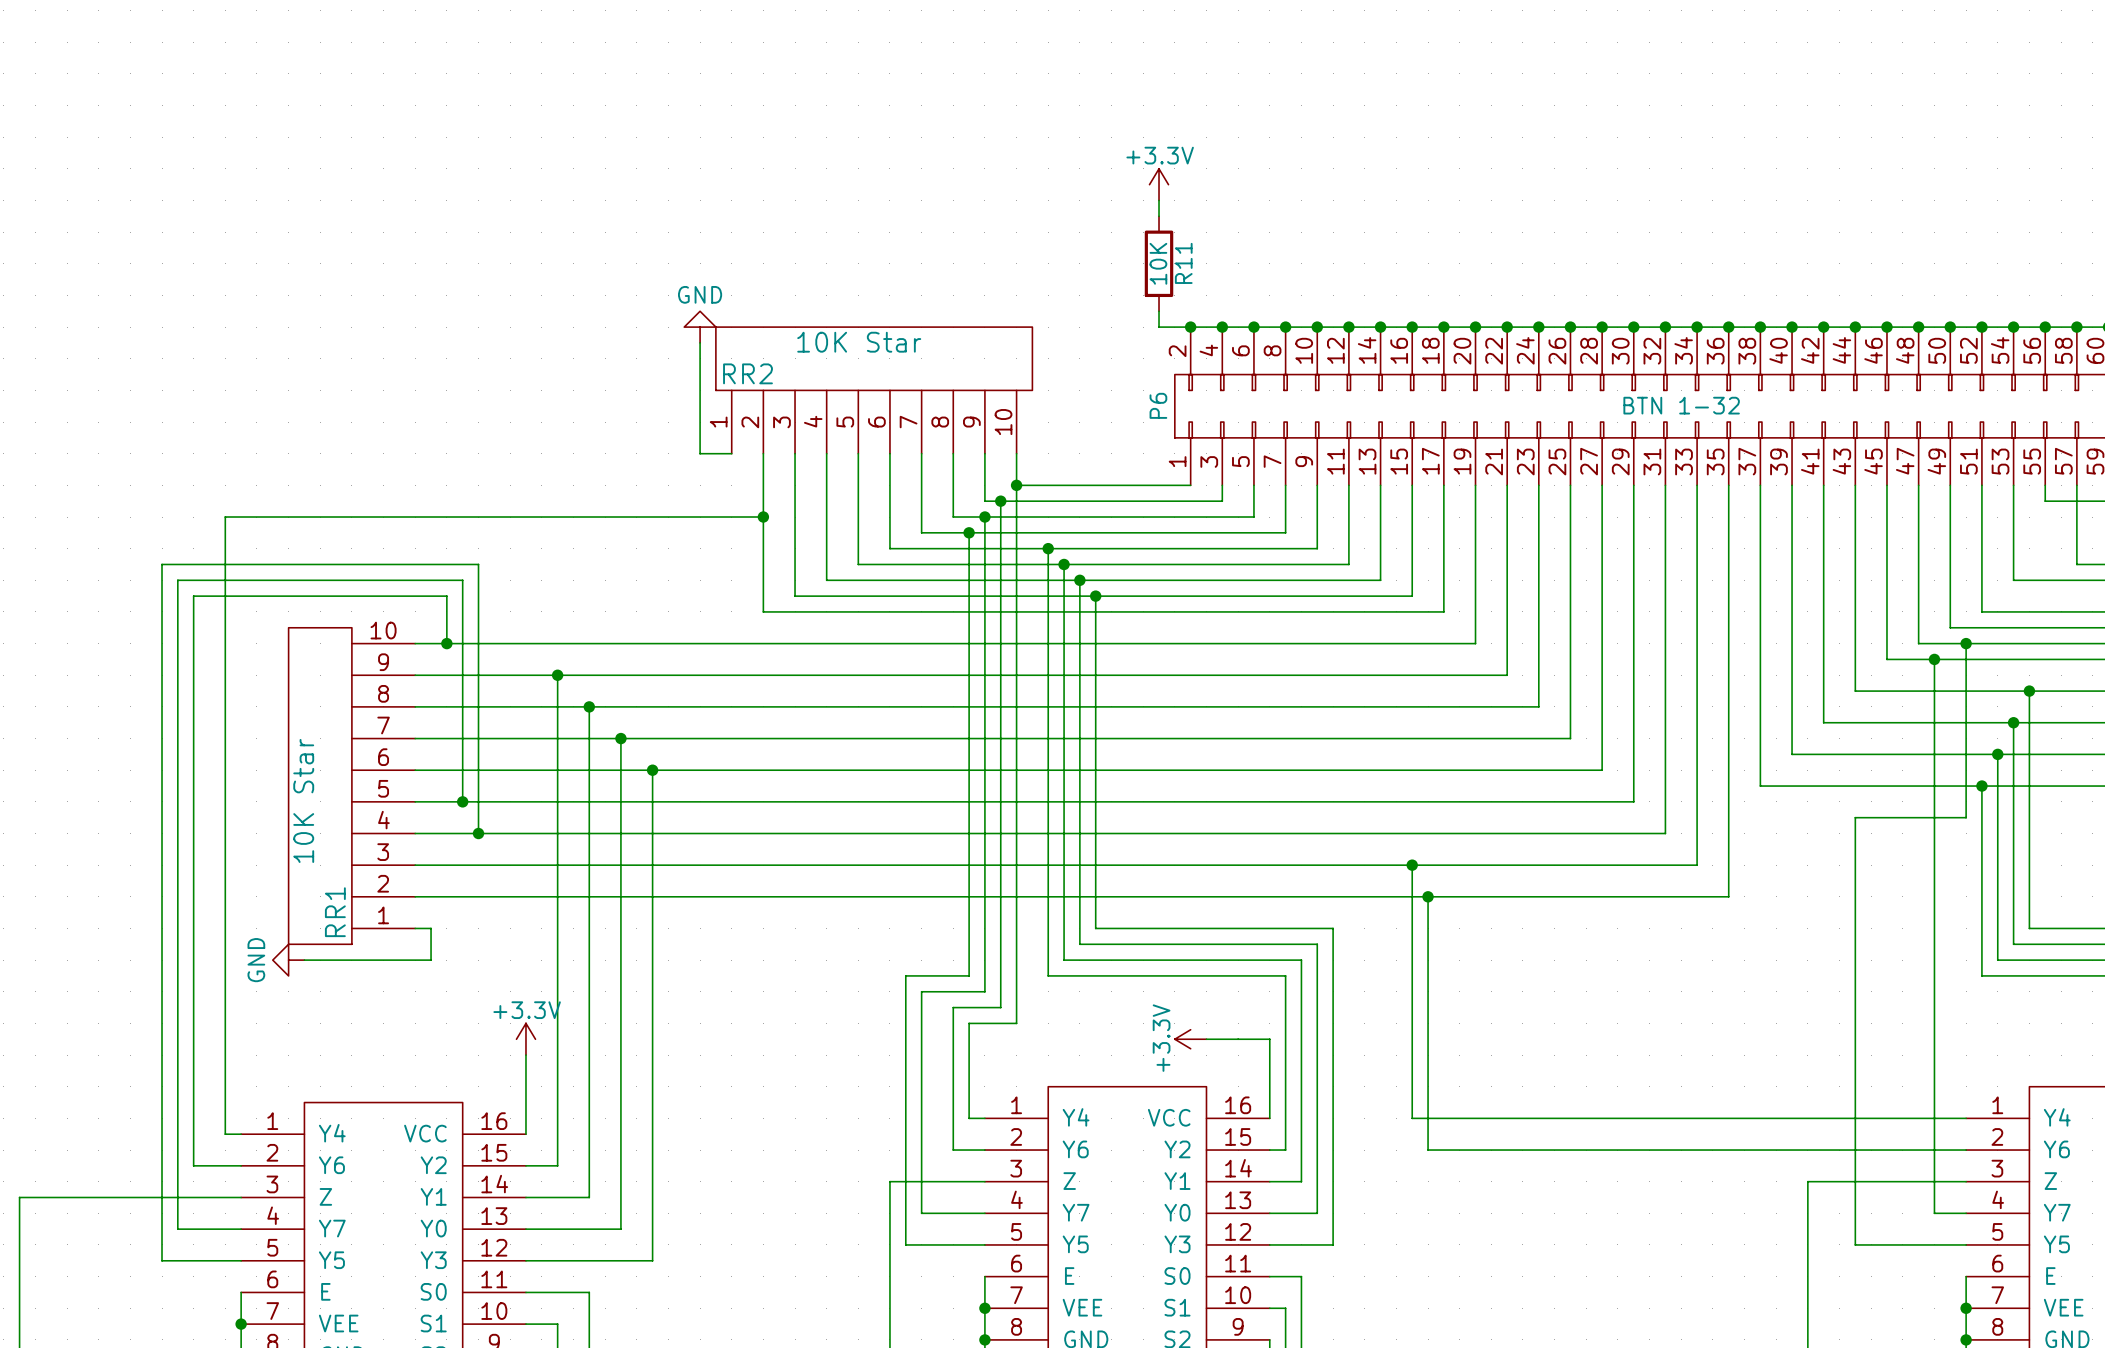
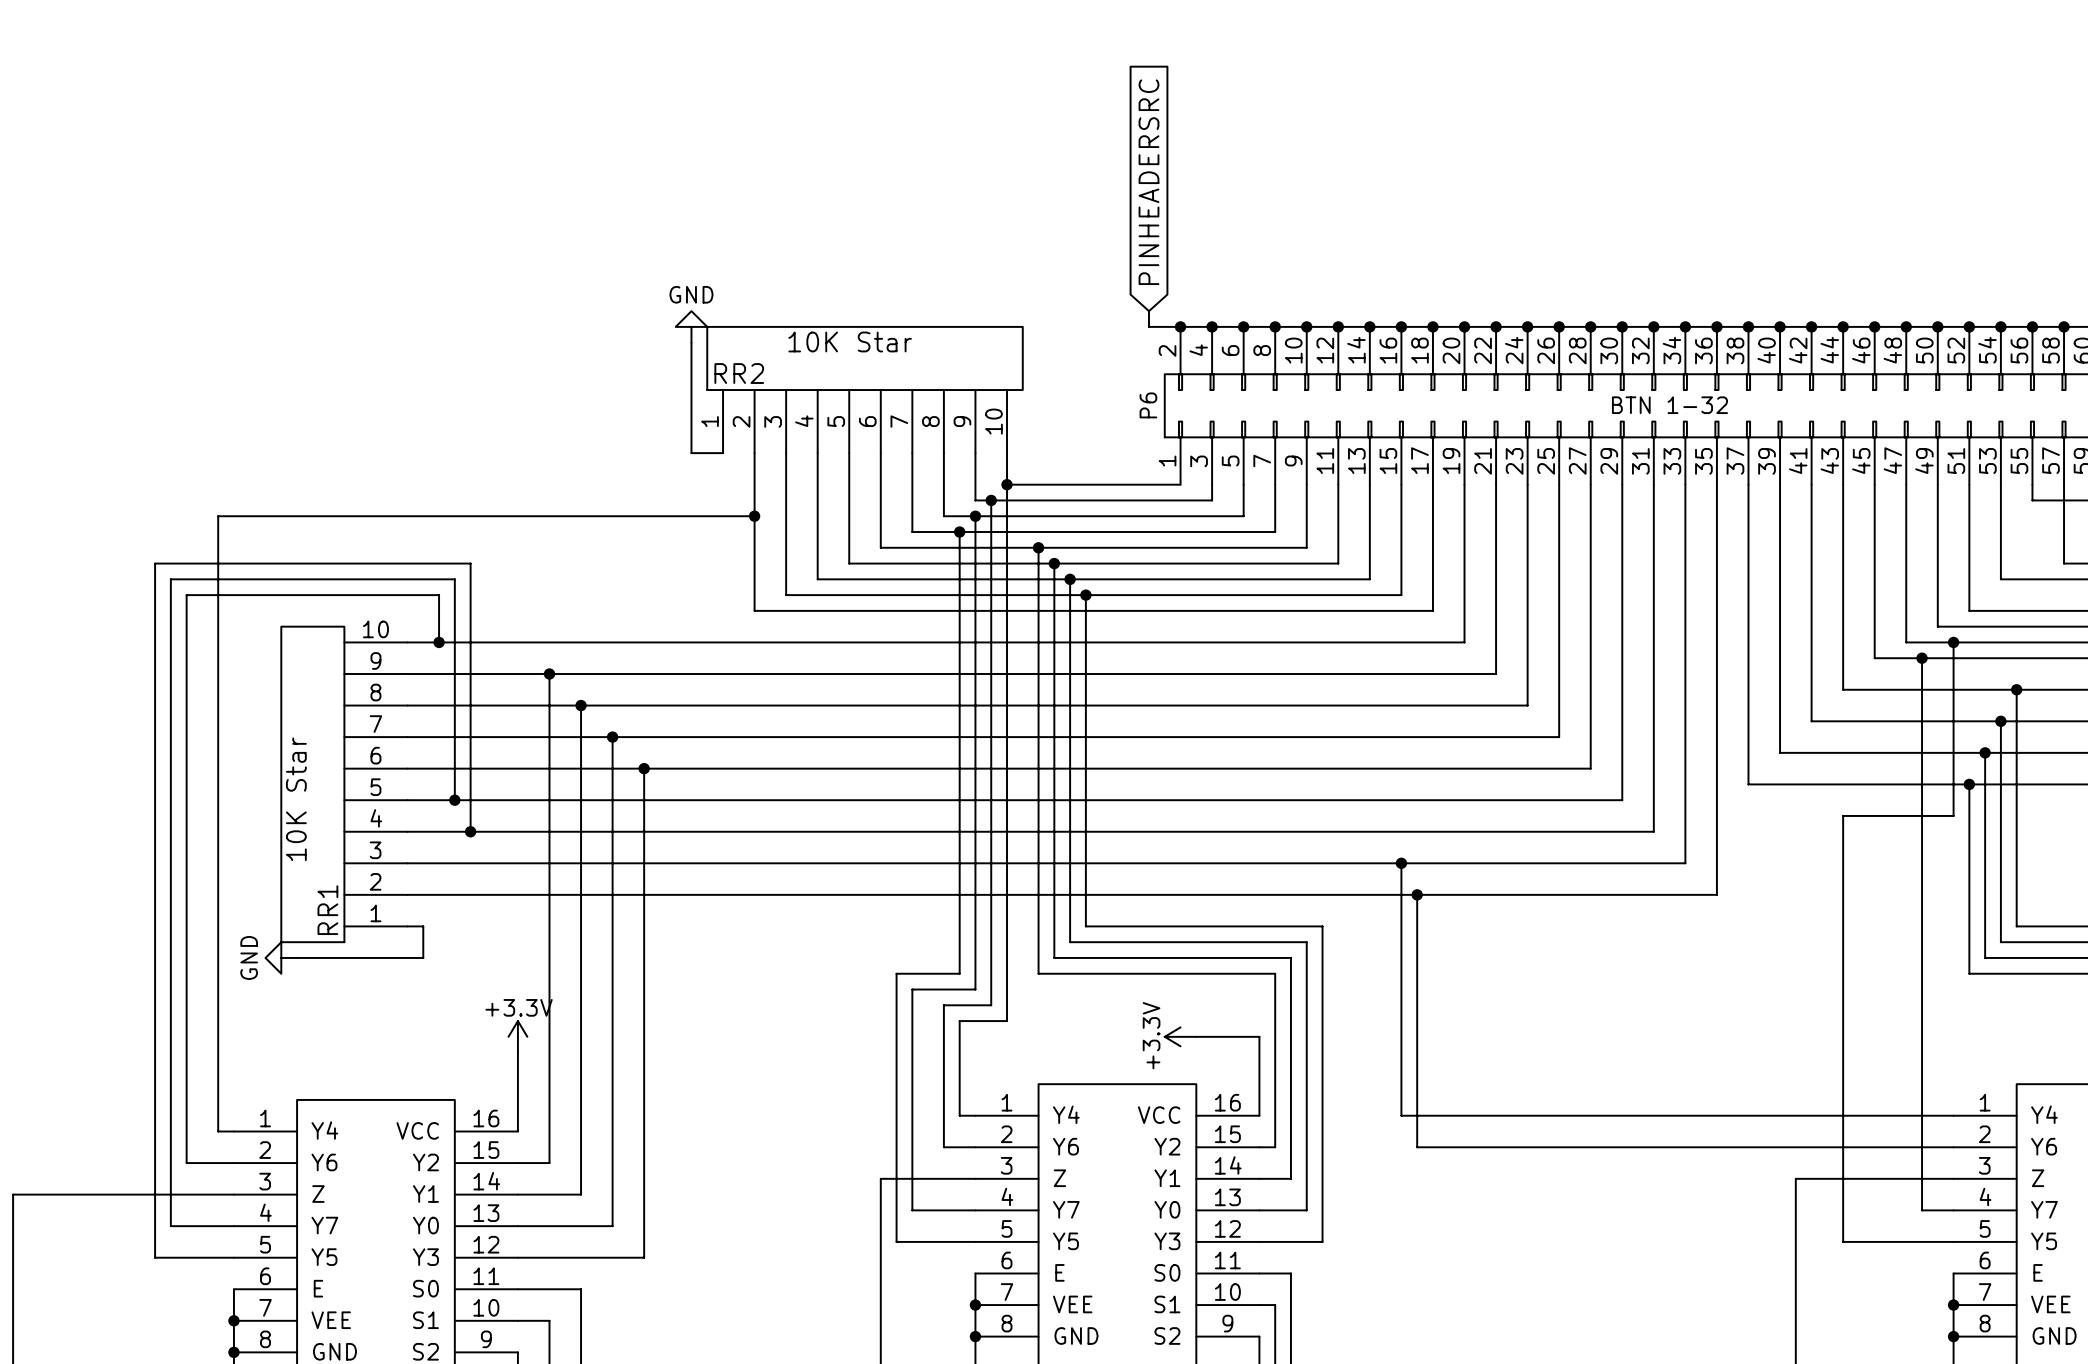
global label: none -> PINHEADERSRC (1148, 182)
power symbol: +3.3V (1159, 184) -> none
wire: (1159, 200) (1159, 216) -> none
R11: 10K (1159, 263) -> none

